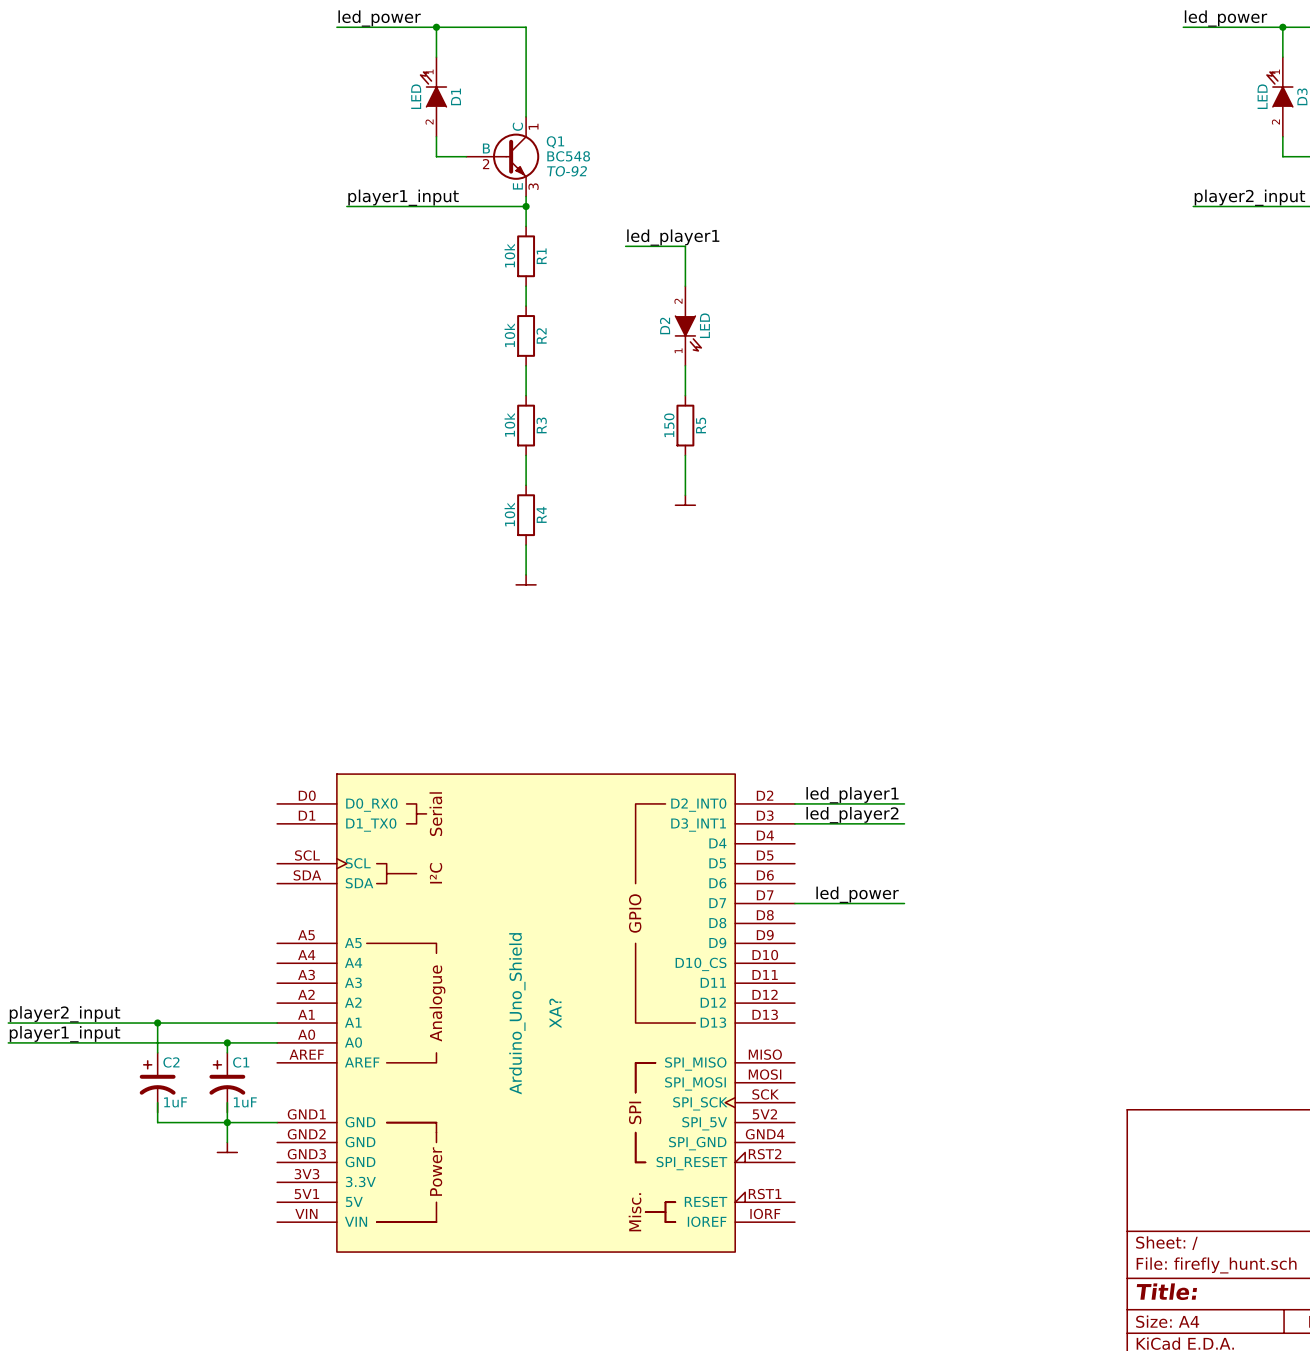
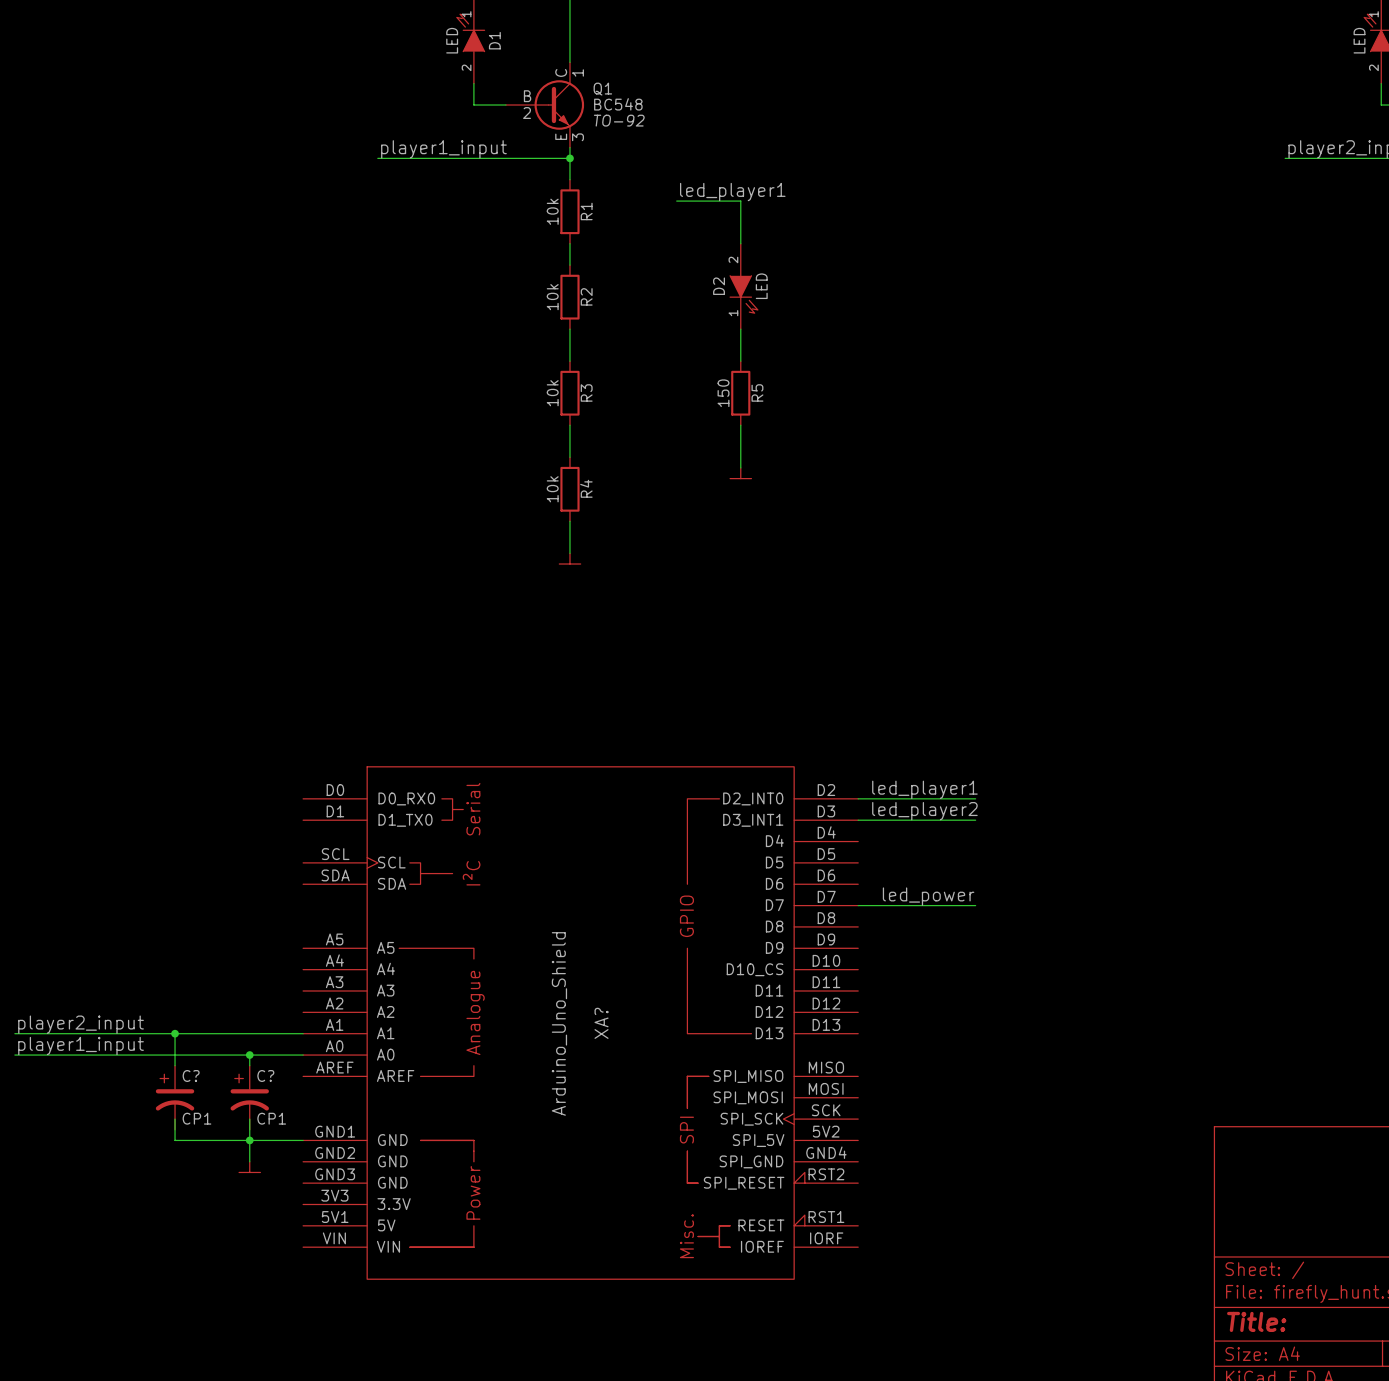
C2 name: C2 (171, 1062) -> C? (191, 1075)
C1 name: C1 (241, 1062) -> C? (265, 1075)
C2 value: 1uF (175, 1102) -> CP1 (196, 1118)
C1 value: 1uF (245, 1102) -> CP1 (271, 1118)

